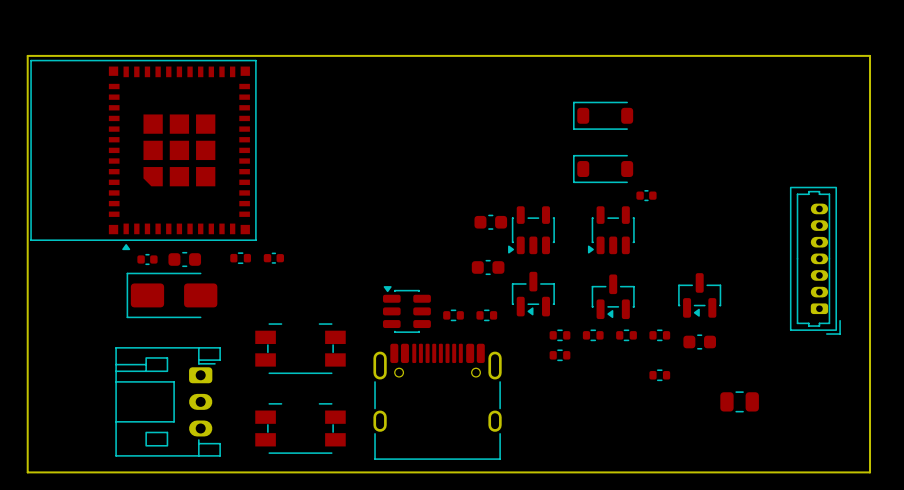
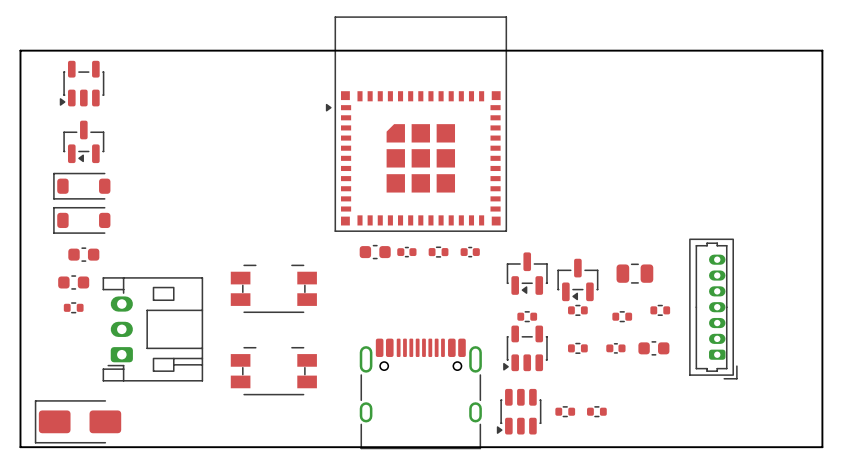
part: none -> (82, 83)
part: (603, 115) -> none
part: none -> (83, 141)
part rotation: 0° (143, 154) -> 90° clockwise (416, 124)
part position: (143, 154) -> (416, 124)
part: (603, 169) -> none
part: (646, 195) -> none
part: none -> (81, 186)
part: (490, 222) -> none
part: (531, 230) -> none
part: (611, 230) -> none
part: none -> (81, 220)
part: (240, 258) -> none
part: (273, 258) -> none
part: (147, 259) -> none
part: (184, 259) -> none
part position: (815, 260) -> (713, 309)
part: none -> (375, 252)
part: none -> (406, 252)
part: none -> (438, 252)
part: (488, 267) -> none
part: none -> (470, 252)
part: none -> (83, 254)
part position: (533, 294) -> (527, 273)
part position: (171, 295) -> (78, 421)
part: (699, 295) -> none
part: none -> (73, 282)
part: none -> (273, 288)
part rotation: 0° (406, 309) -> 90° counterclockwise (519, 411)
part position: (406, 309) -> (519, 411)
part: (453, 315) -> none
part: (486, 315) -> none
part: none -> (73, 307)
part: none -> (577, 310)
part footprint: [683, 334, 716, 350] -> [650, 304, 671, 316]
part: (593, 335) -> none
part: (626, 335) -> none
part: (300, 348) -> none
part: (559, 355) -> none
part: none -> (525, 348)
part: none -> (577, 348)
part: none -> (653, 348)
part footprint: [649, 369, 671, 382] -> [606, 343, 626, 354]
part: none -> (273, 371)
part rotation: 0° (168, 401) -> 180° (152, 329)
part position: (437, 401) -> (420, 393)
part position: (739, 401) -> (634, 273)
part: (300, 428) -> none
part: none -> (565, 411)
part: none -> (596, 411)

